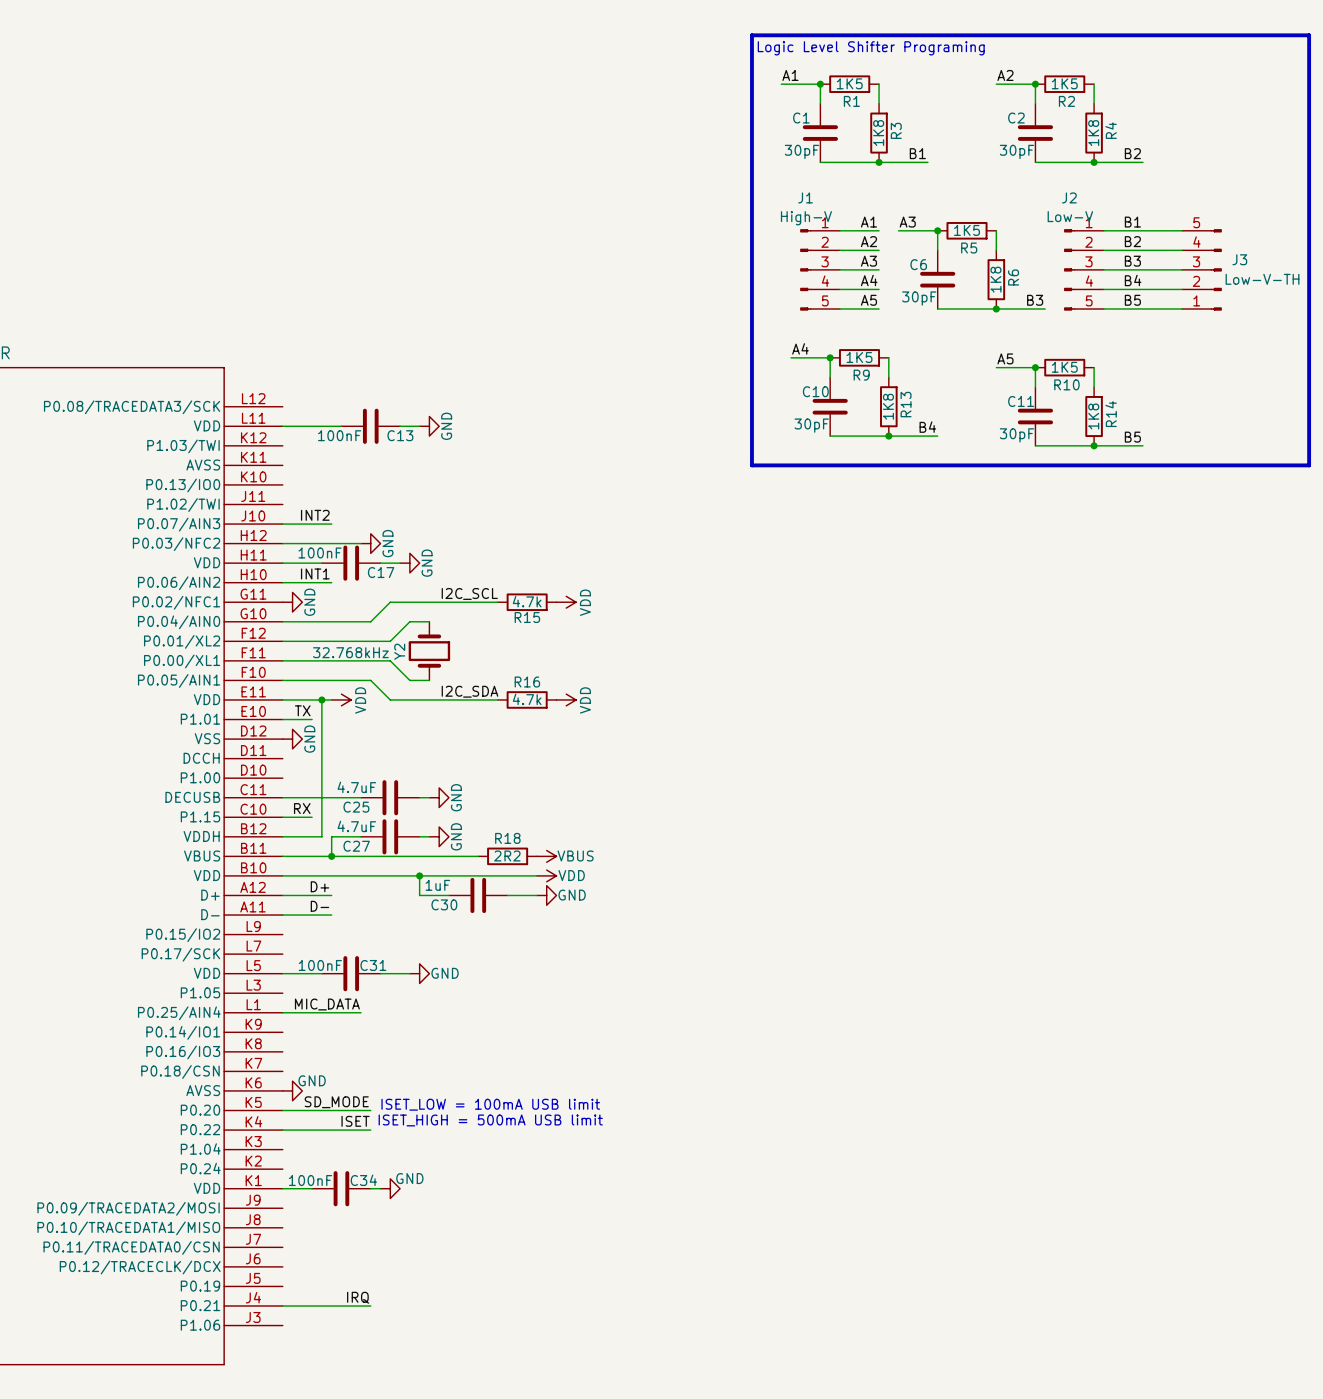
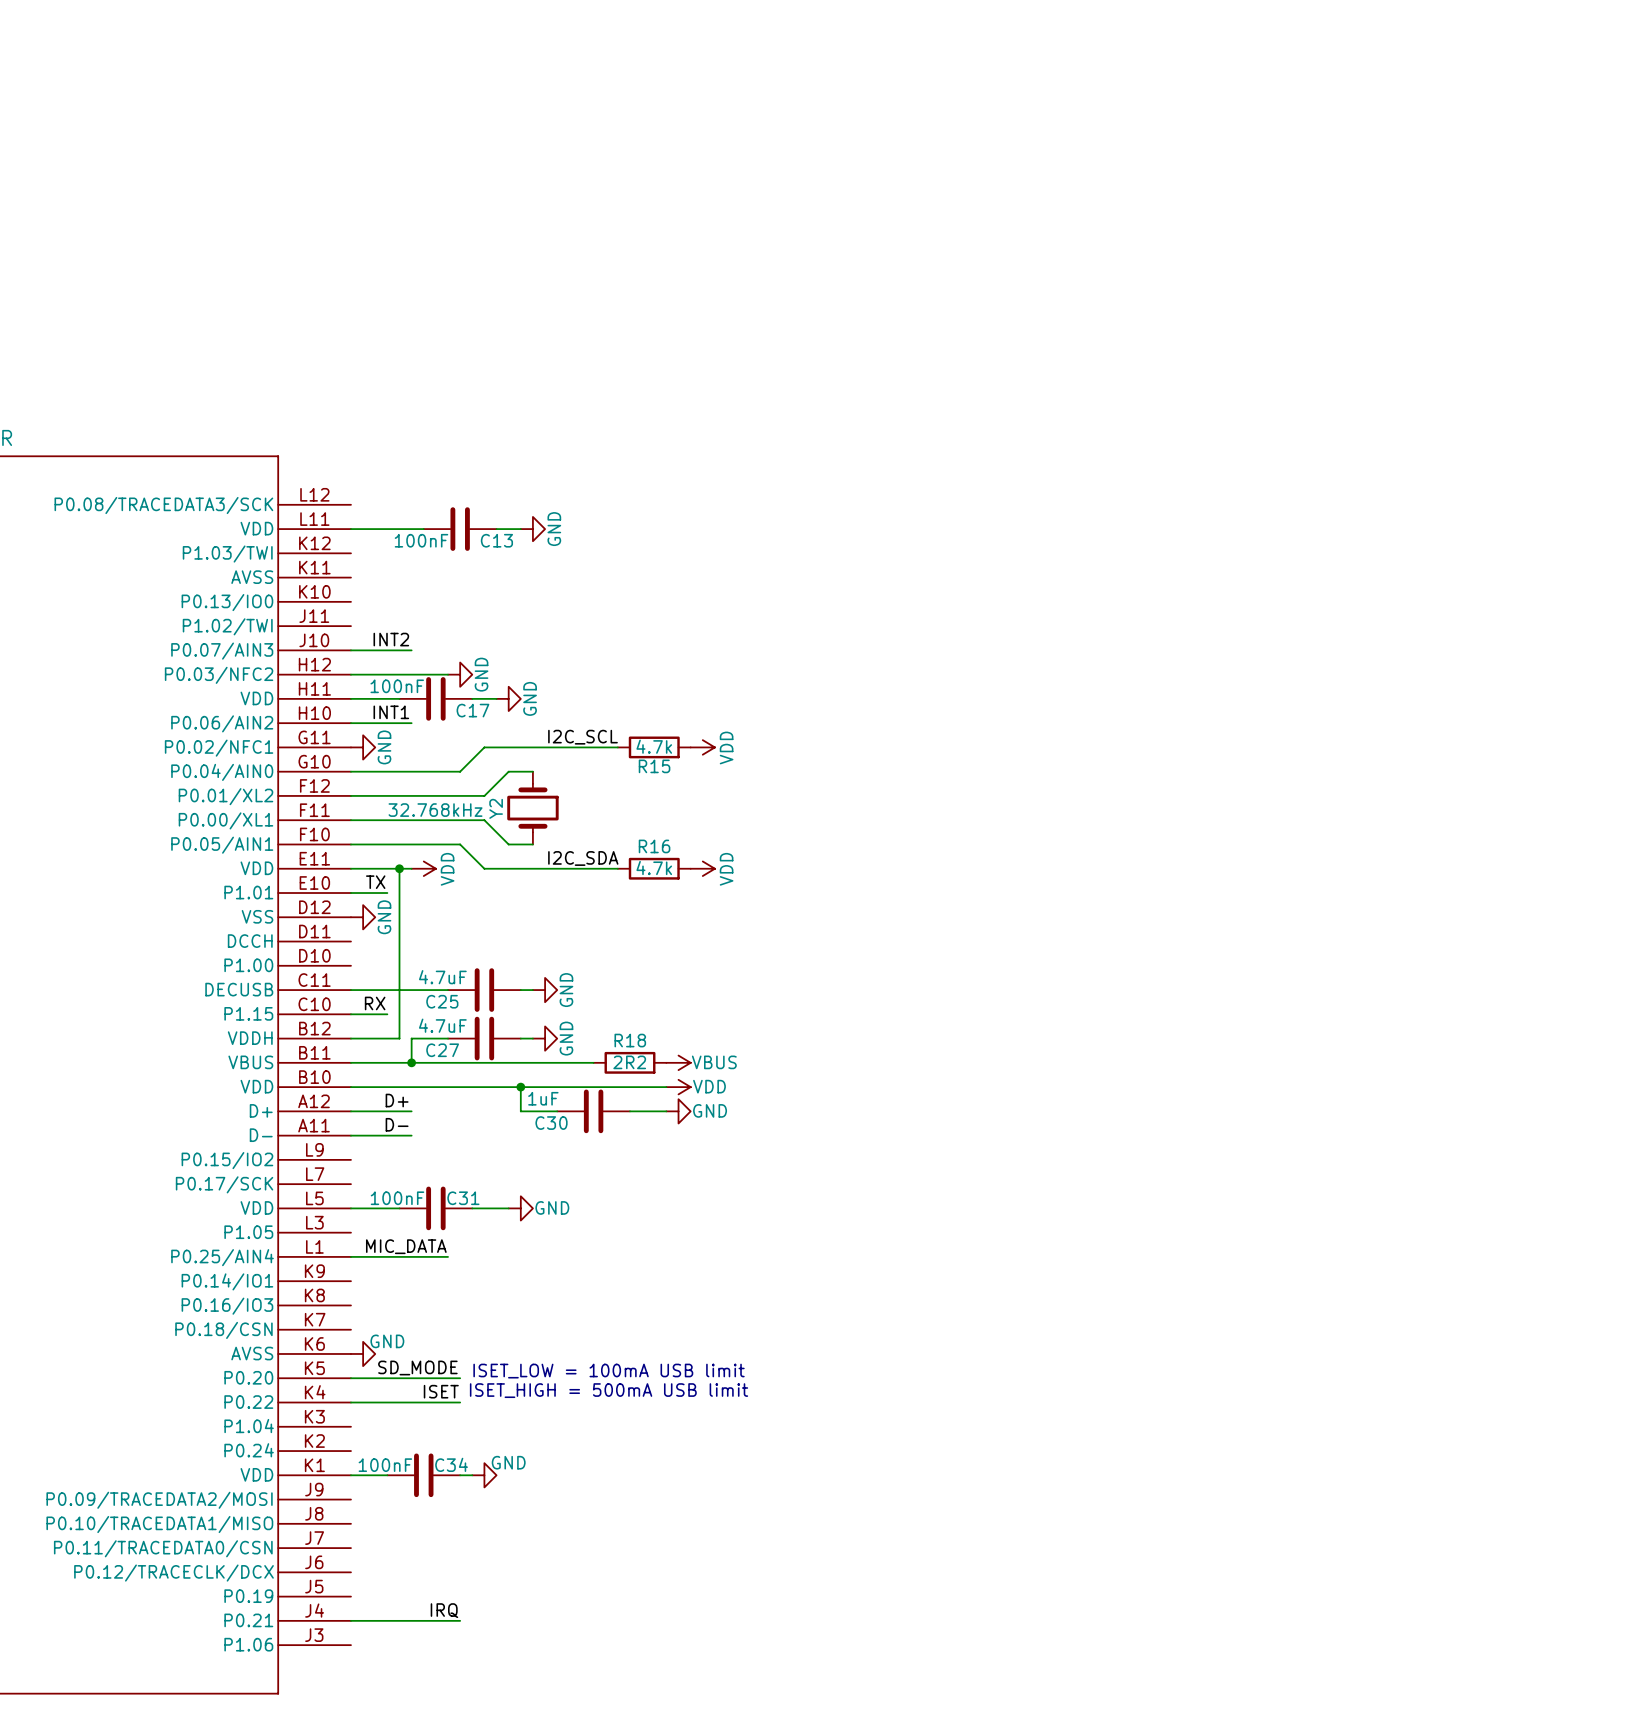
line: (751, 35) (1309, 35) (1309, 465) (751, 465) (751, 35) -> none
text: Logic Level Shifter Programing (871, 48) -> none
label: A1 (790, 75) -> none
label: A2 (1005, 75) -> none
wire: (781, 84) (820, 84) (820, 103) -> none
junction: (820, 84) -> none
R1: 1K5 (849, 84) -> none
wire: (879, 84) (879, 103) -> none
wire: (996, 84) (1035, 84) (1035, 103) -> none
junction: (1035, 84) -> none
R2: 1K5 (1064, 84) -> none
wire: (1094, 84) (1094, 103) -> none
C1: 30pF (820, 133) -> none
R3: 1K8 (879, 133) -> none
C2: 30pF (1035, 133) -> none
R4: 1K8 (1094, 133) -> none
label: B1 (917, 153) -> none
label: B2 (1132, 153) -> none
wire: (820, 162) (927, 162) -> none
junction: (879, 162) -> none
wire: (1035, 162) (1142, 162) -> none
junction: (1094, 162) -> none
label: A1 (868, 222) -> none
label: A3 (907, 222) -> none
label: B1 (1132, 222) -> none
wire: (839, 230) (879, 230) -> none
wire: (898, 230) (937, 230) (937, 250) -> none
junction: (937, 230) -> none
R5: 1K5 (967, 230) -> none
wire: (996, 230) (996, 250) -> none
wire: (1103, 230) (1182, 230) -> none
label: A2 (868, 241) -> none
label: B2 (1132, 241) -> none
wire: (839, 250) (879, 250) -> none
wire: (1103, 250) (1182, 250) -> none
label: A3 (868, 261) -> none
label: B3 (1132, 261) -> none
J1: High-V (820, 269) -> none
wire: (839, 269) (879, 269) -> none
J2: Low-V (1084, 269) -> none
wire: (1103, 269) (1182, 269) -> none
J3: Low-V-TH (1201, 269) -> none
C6: 30pF (937, 279) -> none
R6: 1K8 (996, 279) -> none
label: A4 (869, 280) -> none
label: B4 (1133, 280) -> none
wire: (839, 289) (879, 289) -> none
wire: (1103, 289) (1182, 289) -> none
label: A5 (868, 300) -> none
label: B3 (1035, 300) -> none
label: B5 (1132, 300) -> none
wire: (839, 308) (879, 308) -> none
wire: (937, 308) (1045, 308) -> none
junction: (996, 308) -> none
wire: (1103, 308) (1182, 308) -> none
label: A4 (800, 348) -> none
wire: (791, 357) (830, 357) (830, 377) -> none
junction: (830, 357) -> none
R9: 1K5 (859, 357) -> none
wire: (888, 357) (888, 377) -> none
label: A5 (1005, 358) -> none
wire: (996, 367) (1035, 367) (1035, 387) -> none
junction: (1035, 367) -> none
R10: 1K5 (1064, 367) -> none
wire: (1094, 367) (1094, 387) -> none
C10: 30pF (830, 406) -> none
R13: 1K8 (888, 406) -> none
C11: 30pF (1035, 416) -> none
R14: 1K8 (1094, 416) -> none
label: B4 (927, 427) -> none
wire: (830, 436) (937, 436) -> none
junction: (888, 436) -> none
label: B5 (1132, 437) -> none
wire: (1035, 445) (1142, 445) -> none
junction: (1094, 445) -> none

